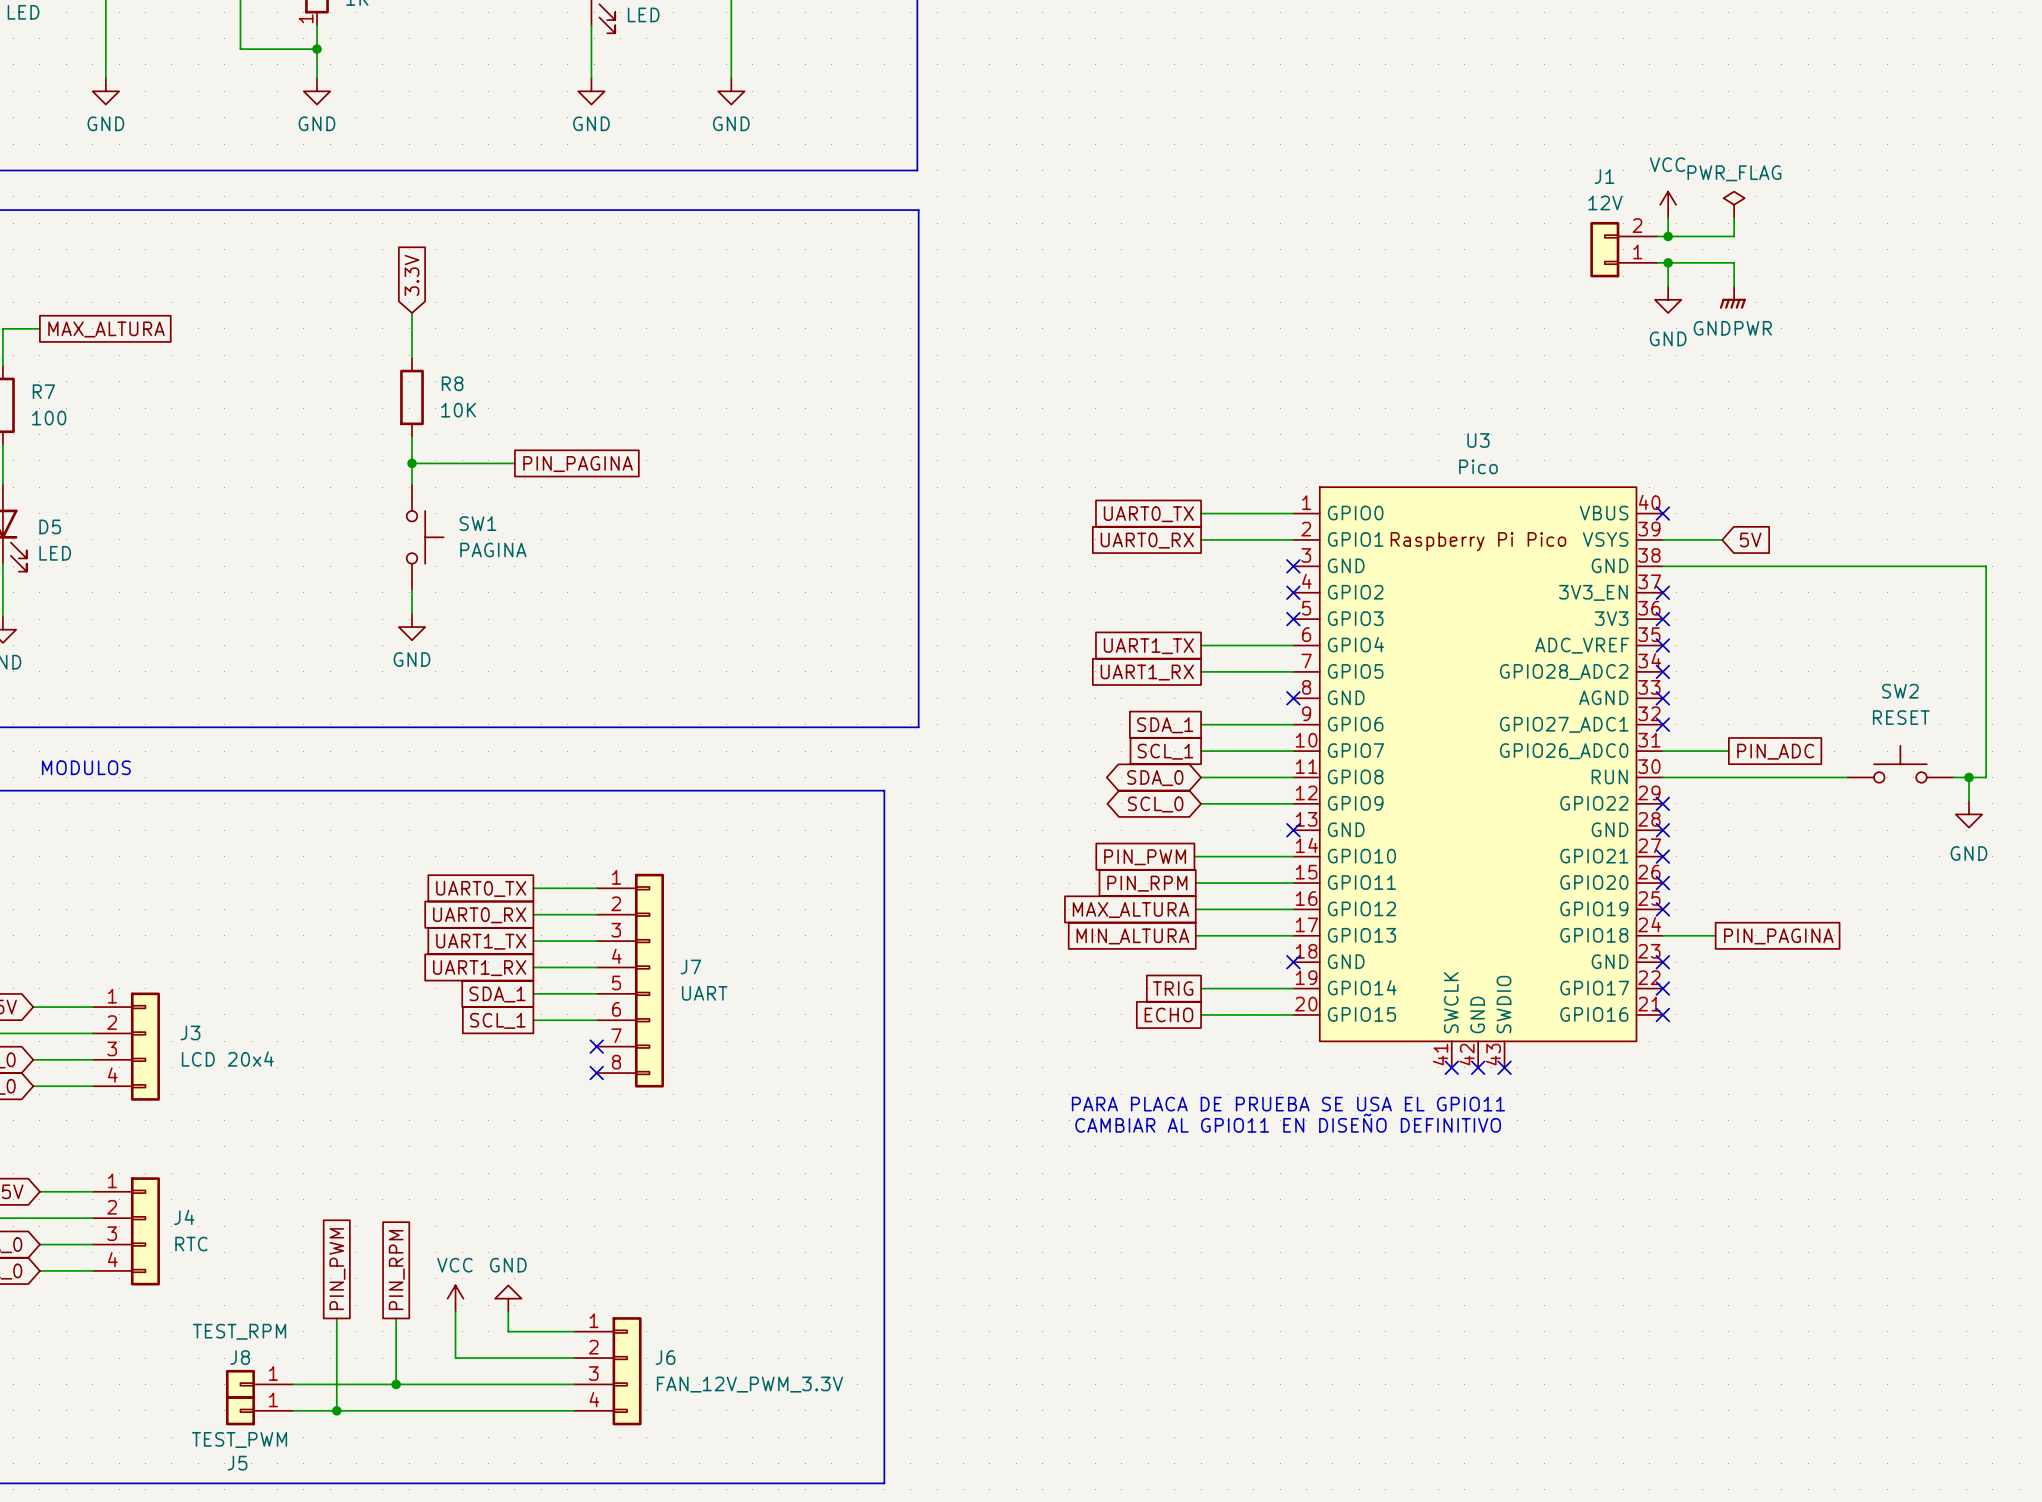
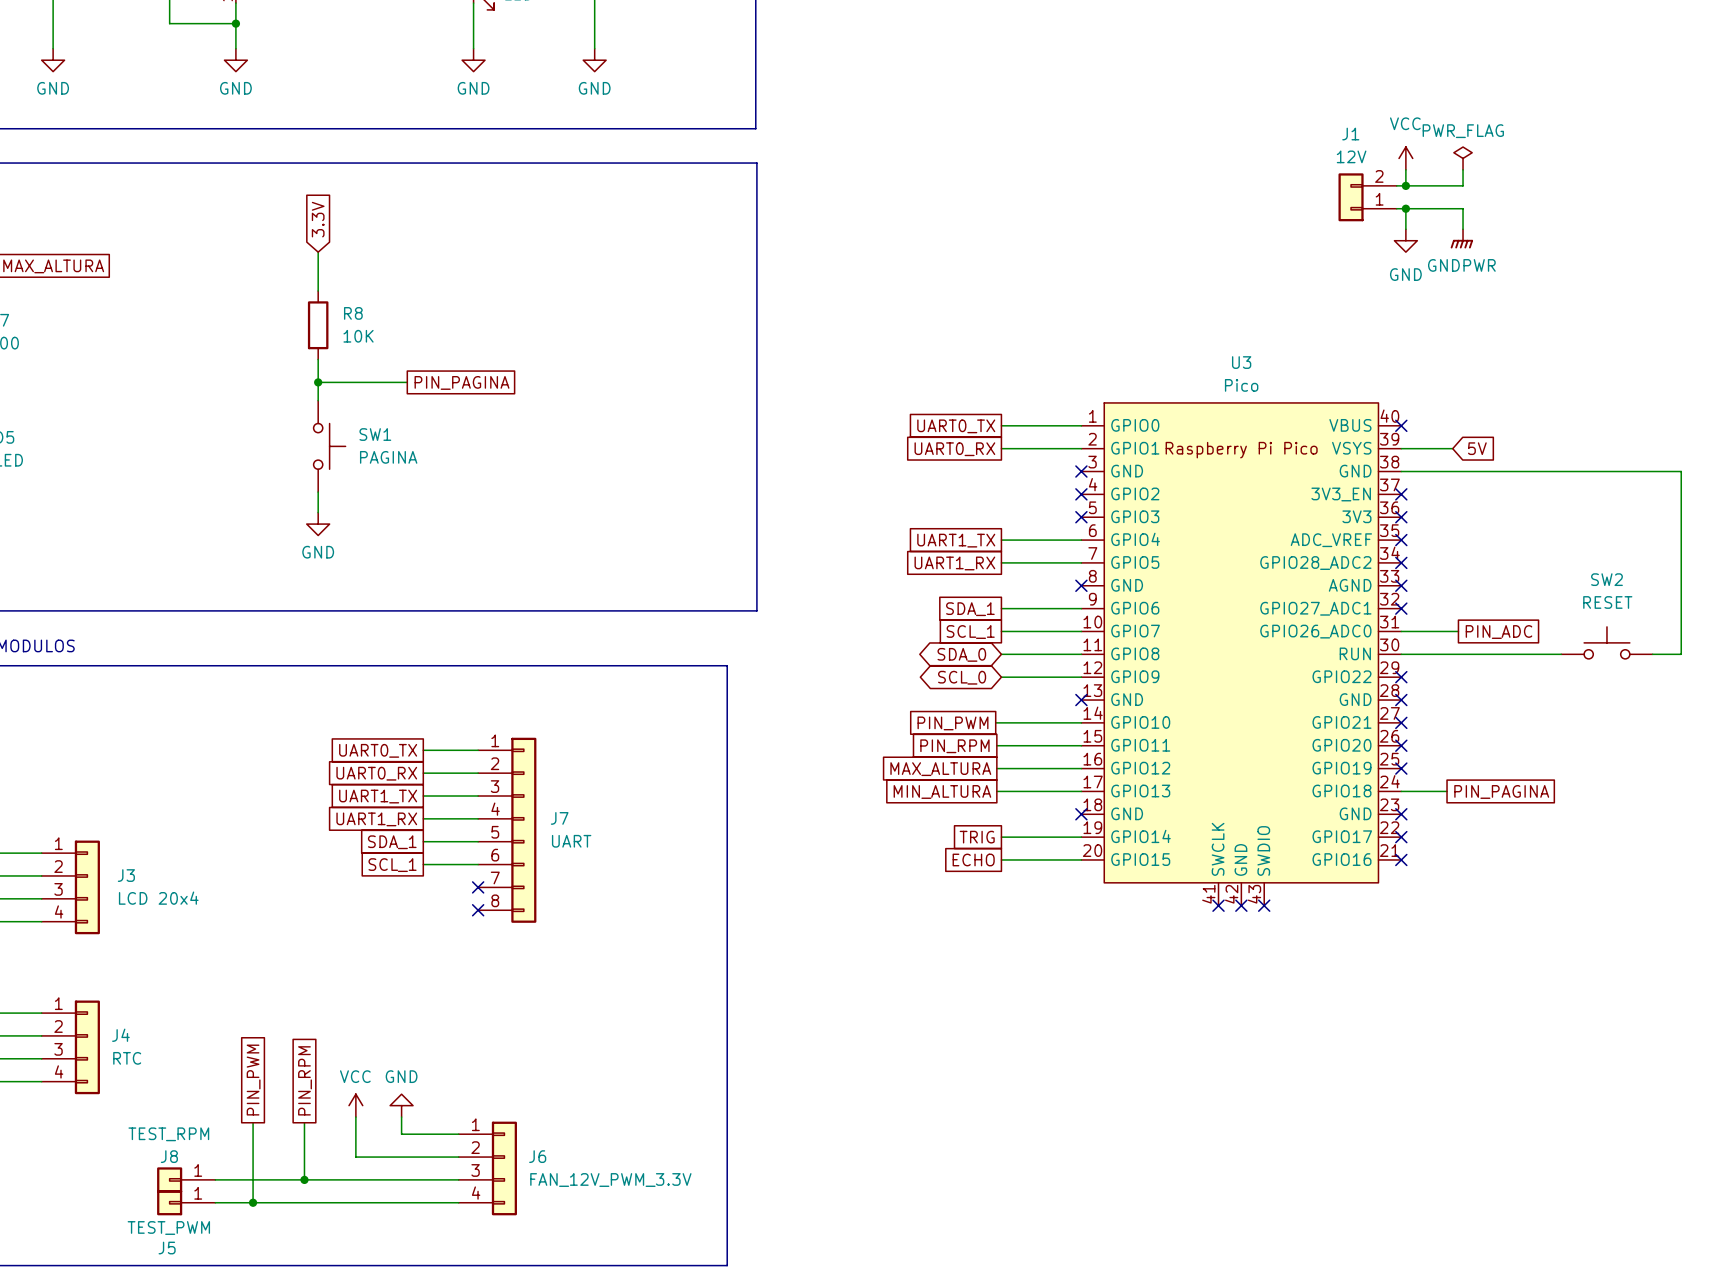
wire: (1968, 777) (1968, 801) -> none
junction: (1968, 777) -> none
power symbol: GND (1968, 814) -> none
text: PARA PLACA DE PRUEBA SE USA EL GPIO11 (1288, 1104) -> none
text: CAMBIAR AL GPIO11 EN DISEÑO DEFINITIVO (1288, 1123) -> none

